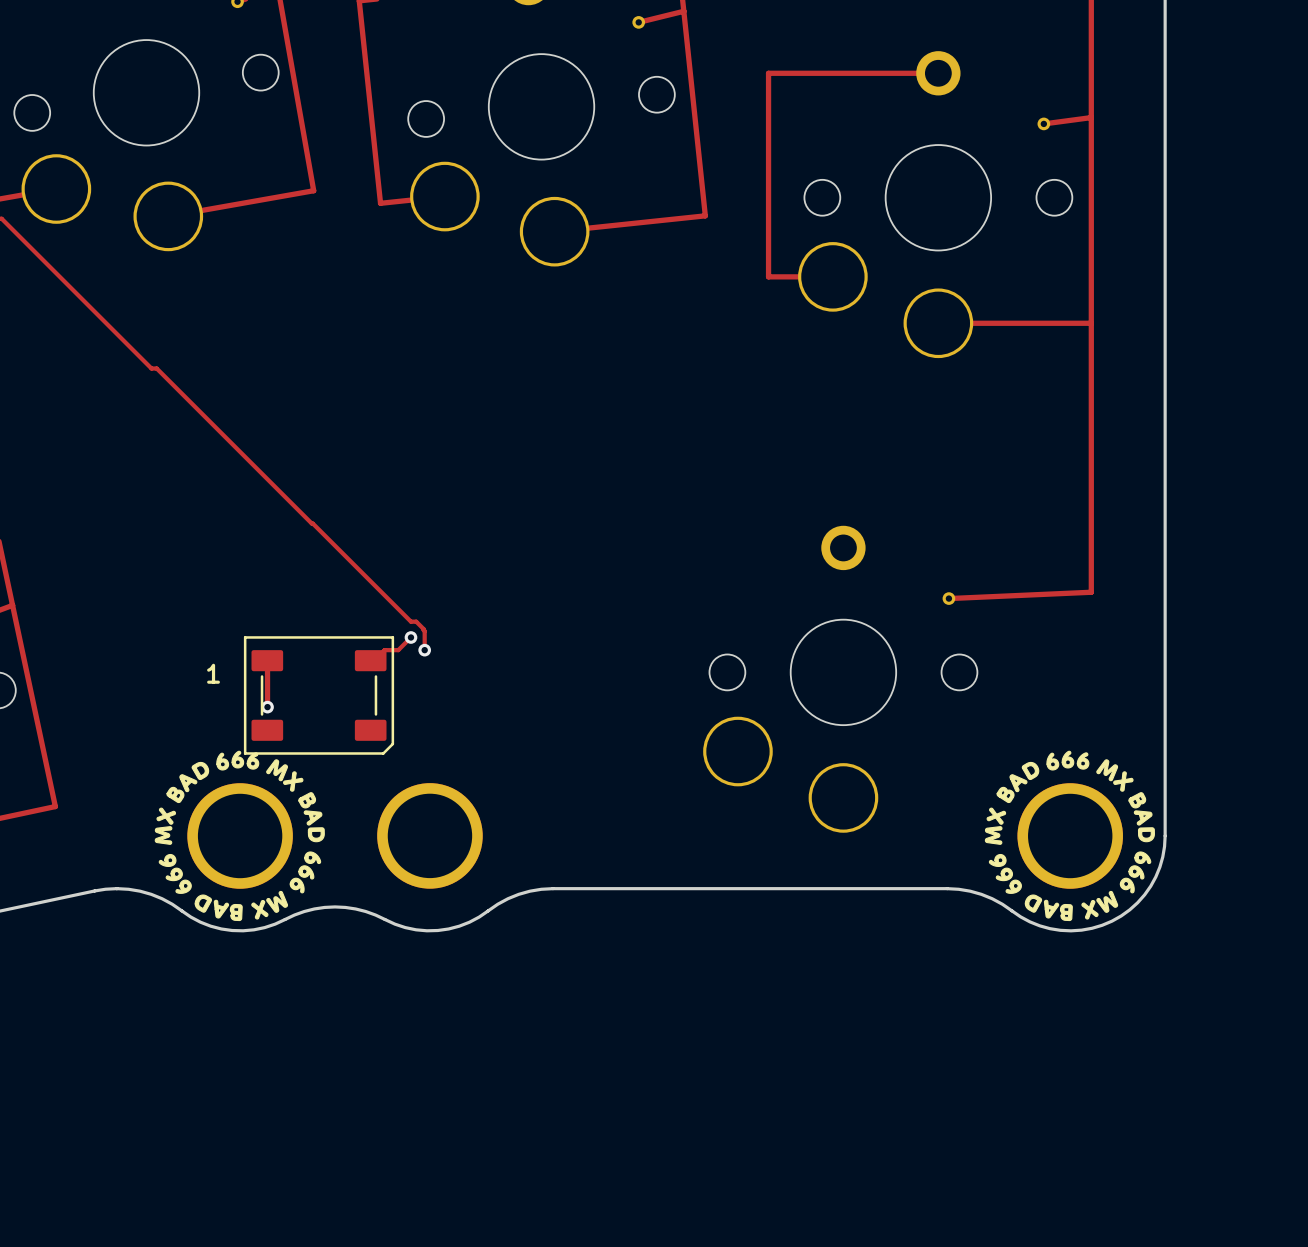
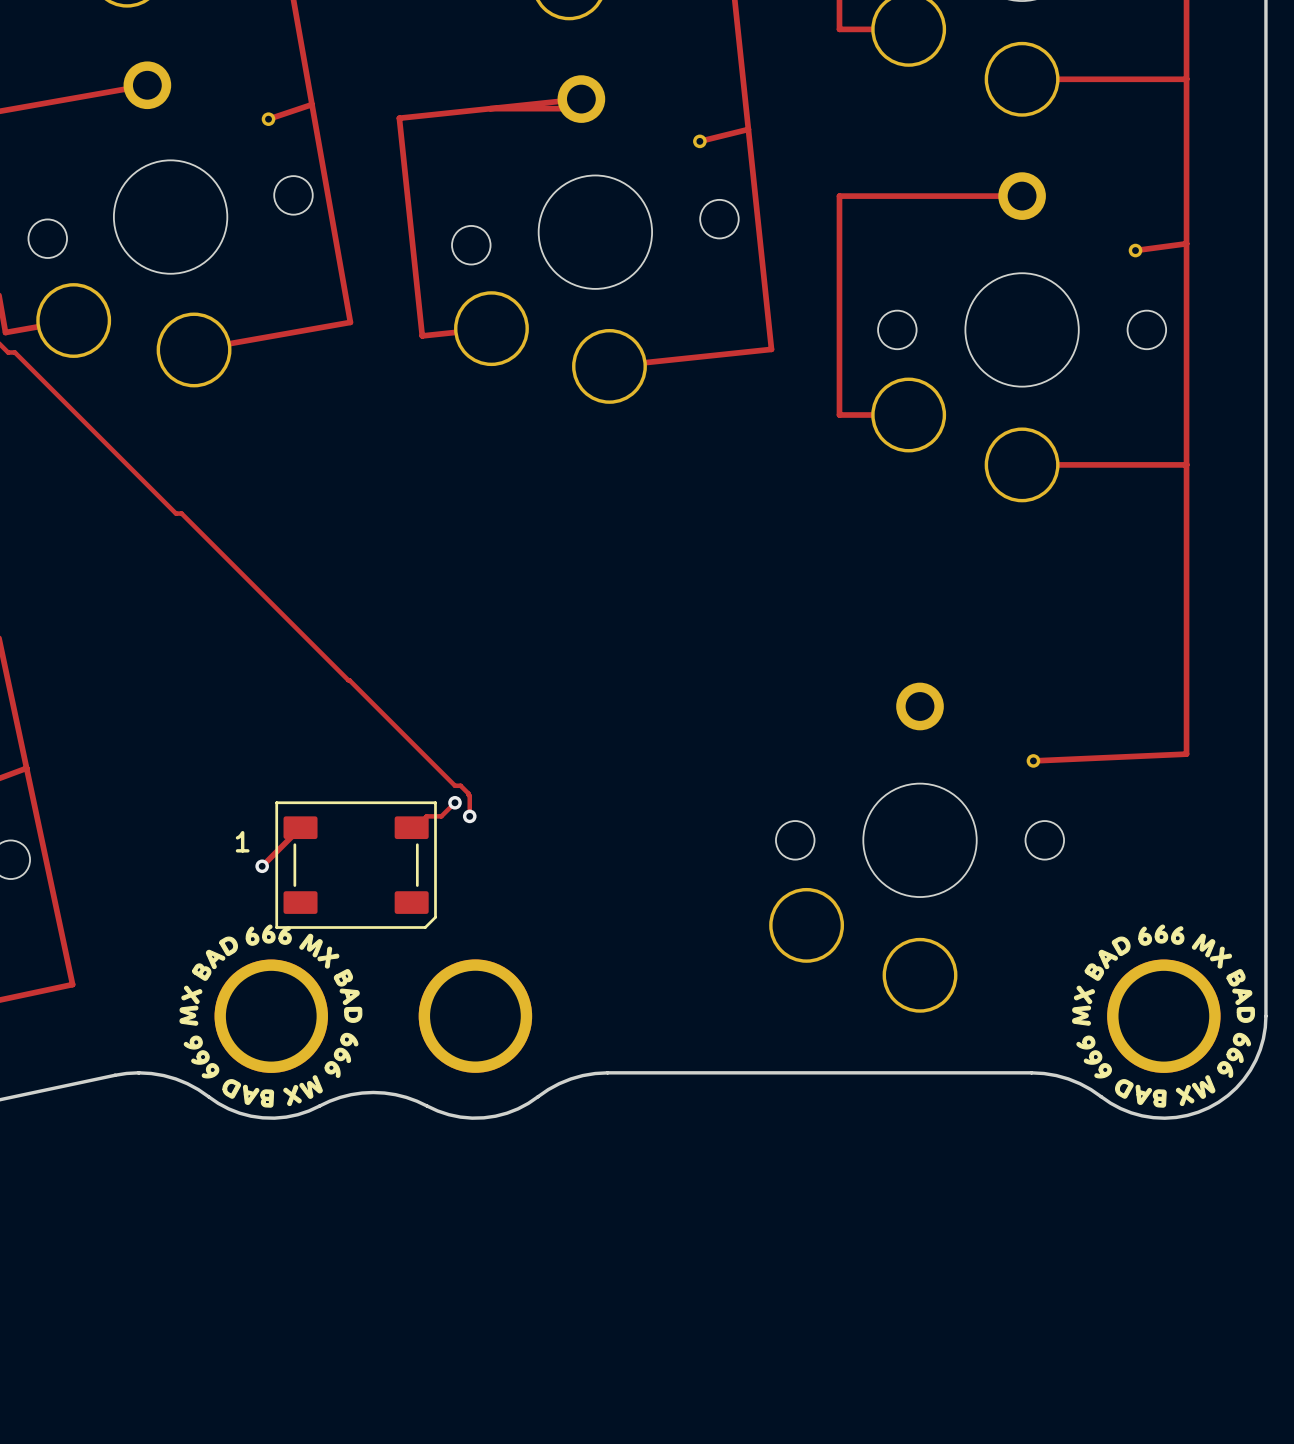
track: (267, 660) (267, 707) -> (300, 827) (262, 866)
via position: (267, 707) -> (262, 866)

